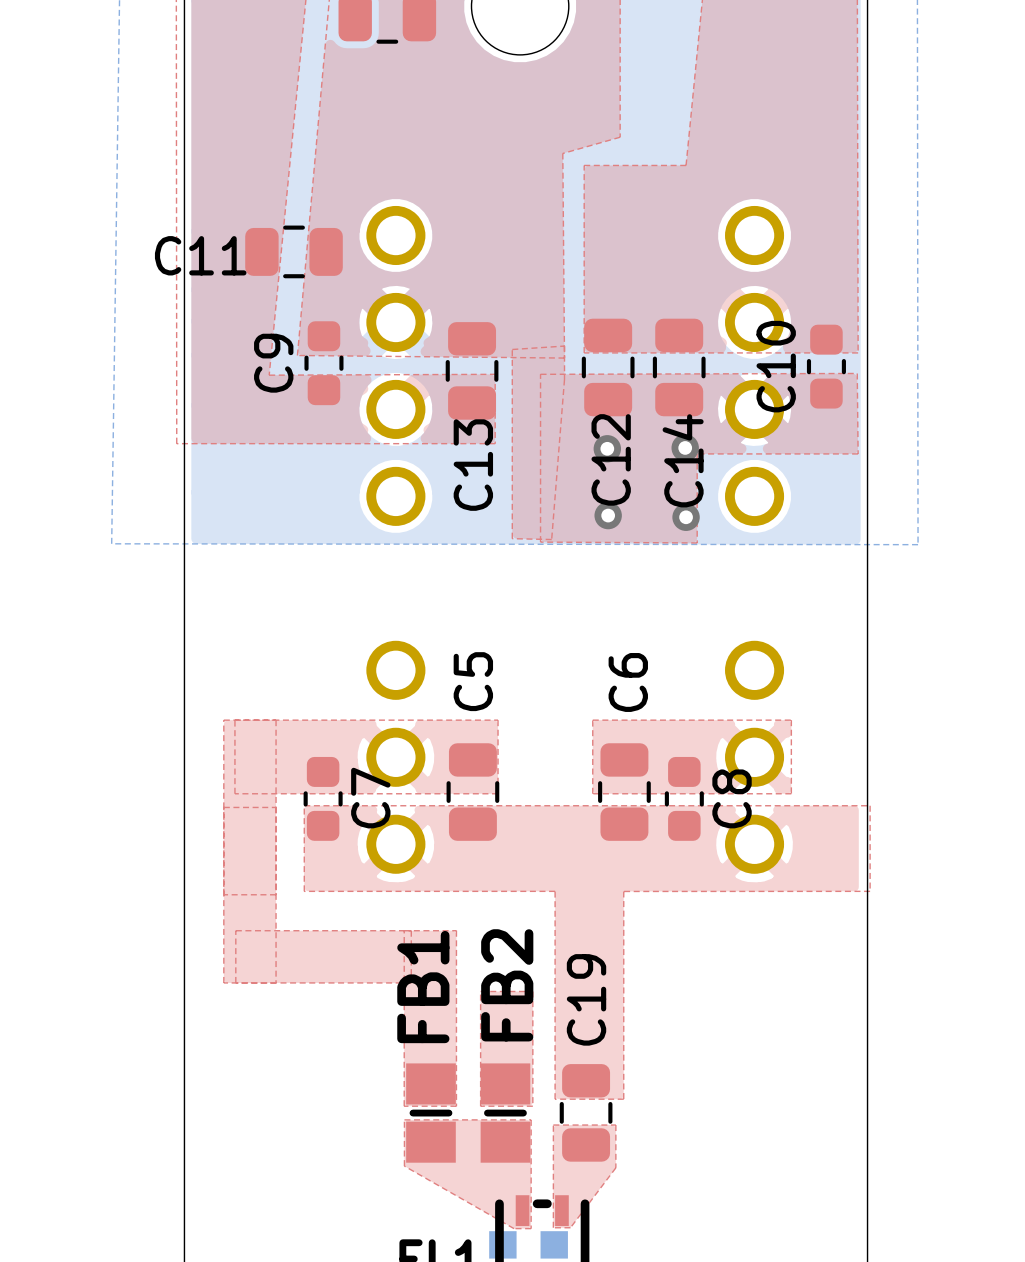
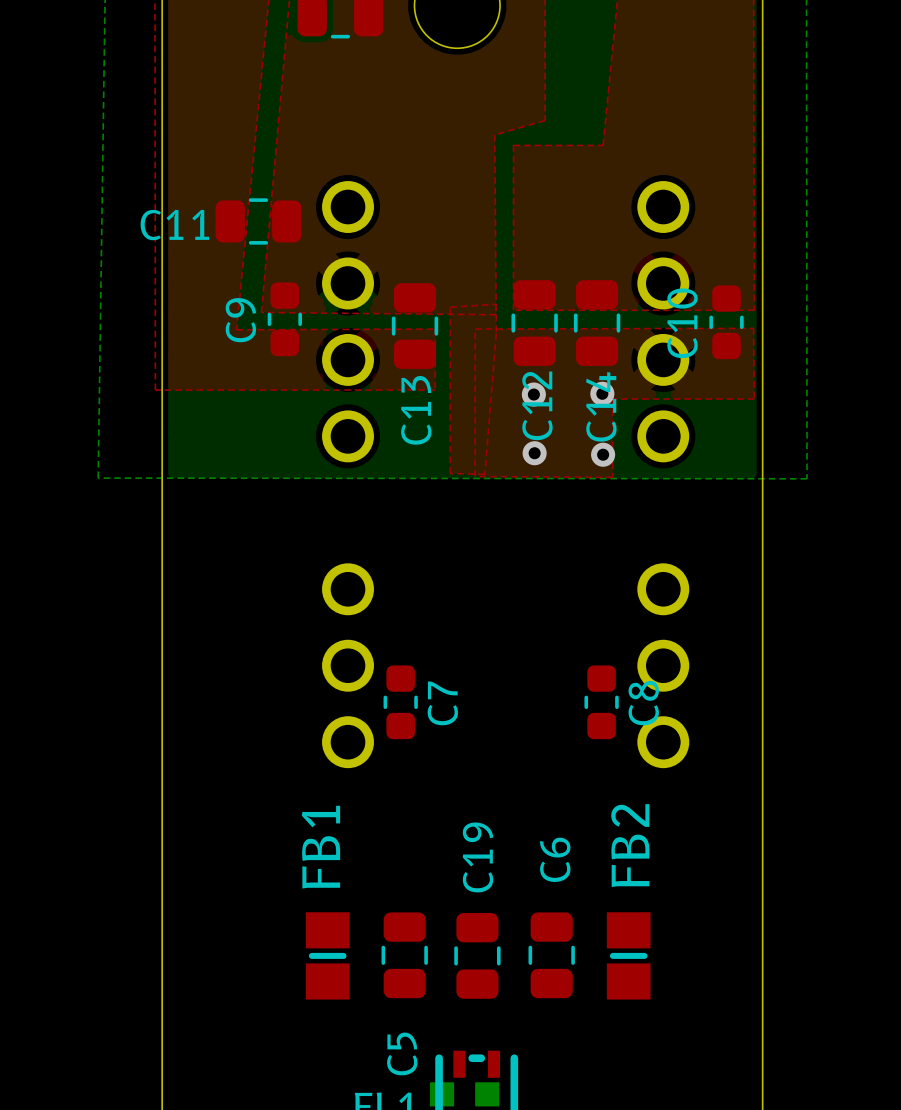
C5 name position: C5 (473, 681) -> C5 (402, 1053)
top zone outline: (234, 720) (234, 793) (498, 793) (498, 720) (223, 720) (223, 982) (411, 982) (411, 930) -> none
top zone outline: (276, 720) (276, 982) -> none
top zone outline: (592, 720) (592, 793) (791, 793) (791, 720) (592, 720) -> none
C5 position: (472, 792) -> (404, 955)
C6 position: (624, 792) -> (551, 955)
C7 position: (323, 798) -> (400, 702)
top zone outline: (304, 805) (304, 891) (555, 891) (555, 1099) (623, 1099) (623, 891) (870, 891) (870, 805) (304, 805) -> none
top zone outline: (223, 807) (276, 807) -> none
top zone outline: (223, 894) (276, 894) -> none
top zone outline: (404, 930) (404, 1106) (456, 1106) (456, 930) (235, 930) (235, 982) -> none
top zone outline: (480, 991) (480, 1106) (532, 1106) (532, 991) (480, 991) -> none
C19 position: (586, 1112) -> (477, 955)
FB1 position: (430, 1113) -> (327, 955)
FB2 position: (505, 1113) -> (628, 955)
top zone outline: (404, 1119) (404, 1166) (514, 1228) (531, 1228) (531, 1119) (404, 1119) -> none
top zone outline: (553, 1125) (553, 1227) (570, 1227) (615, 1167) (615, 1125) (553, 1125) -> none

